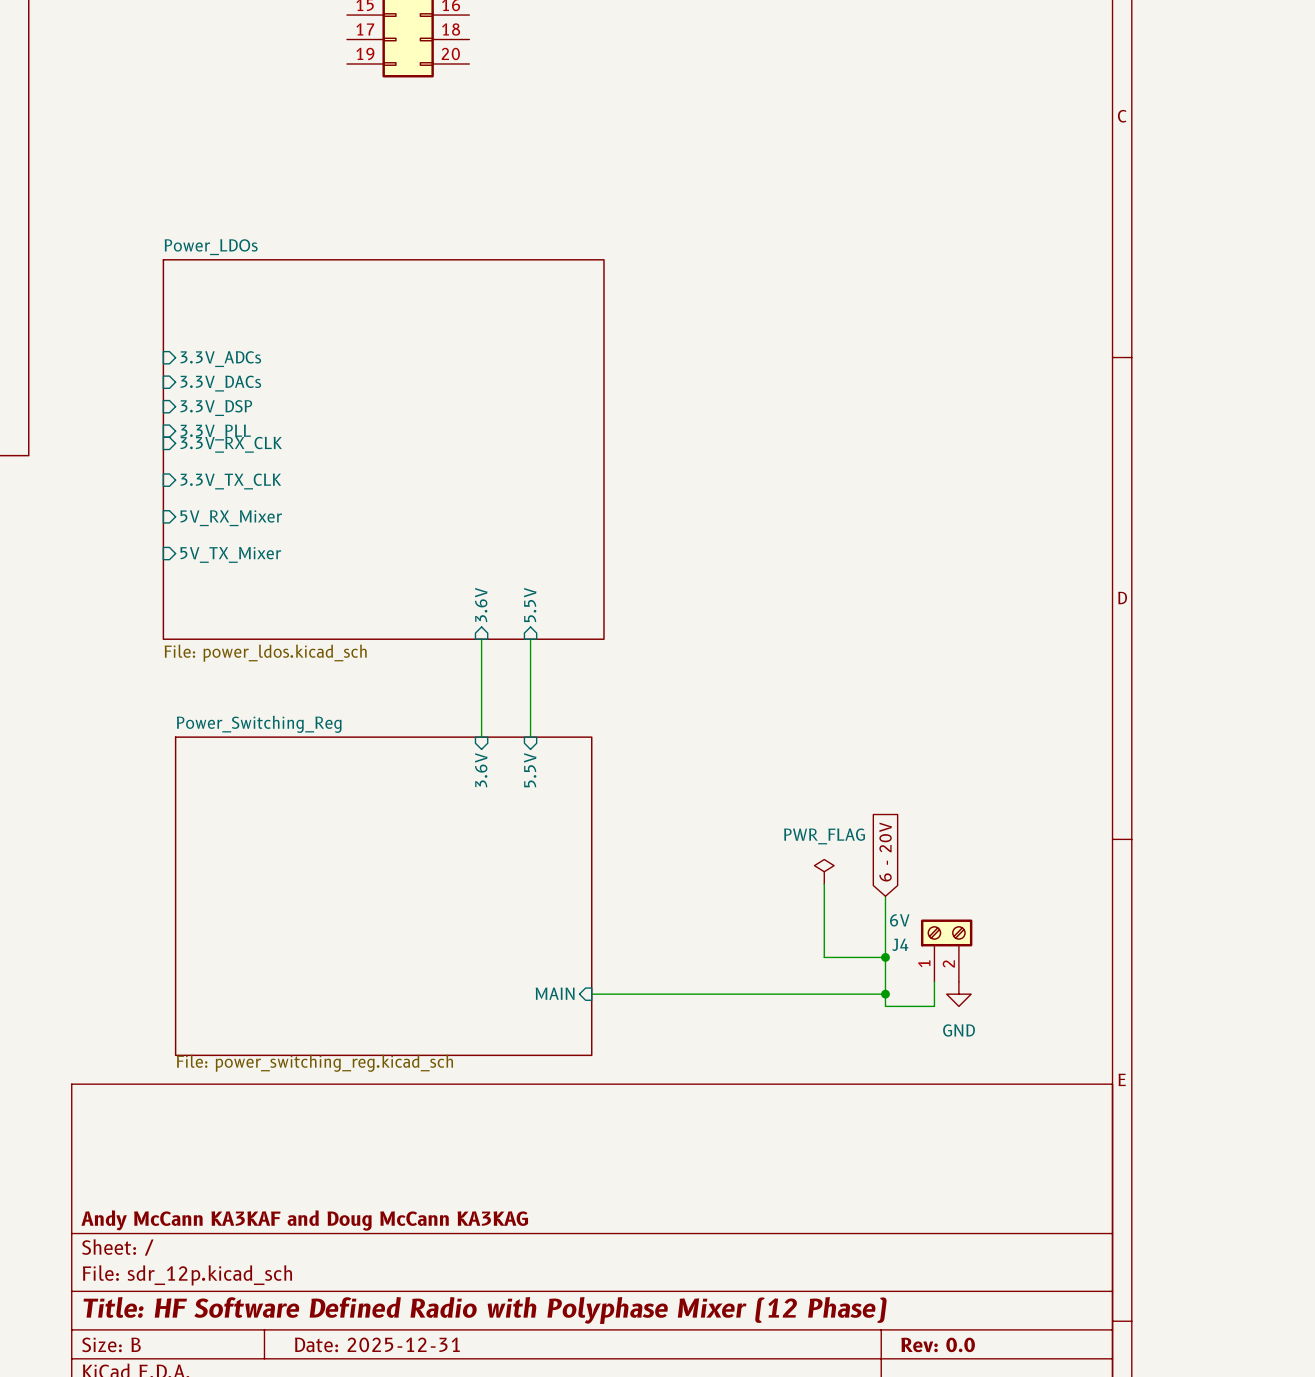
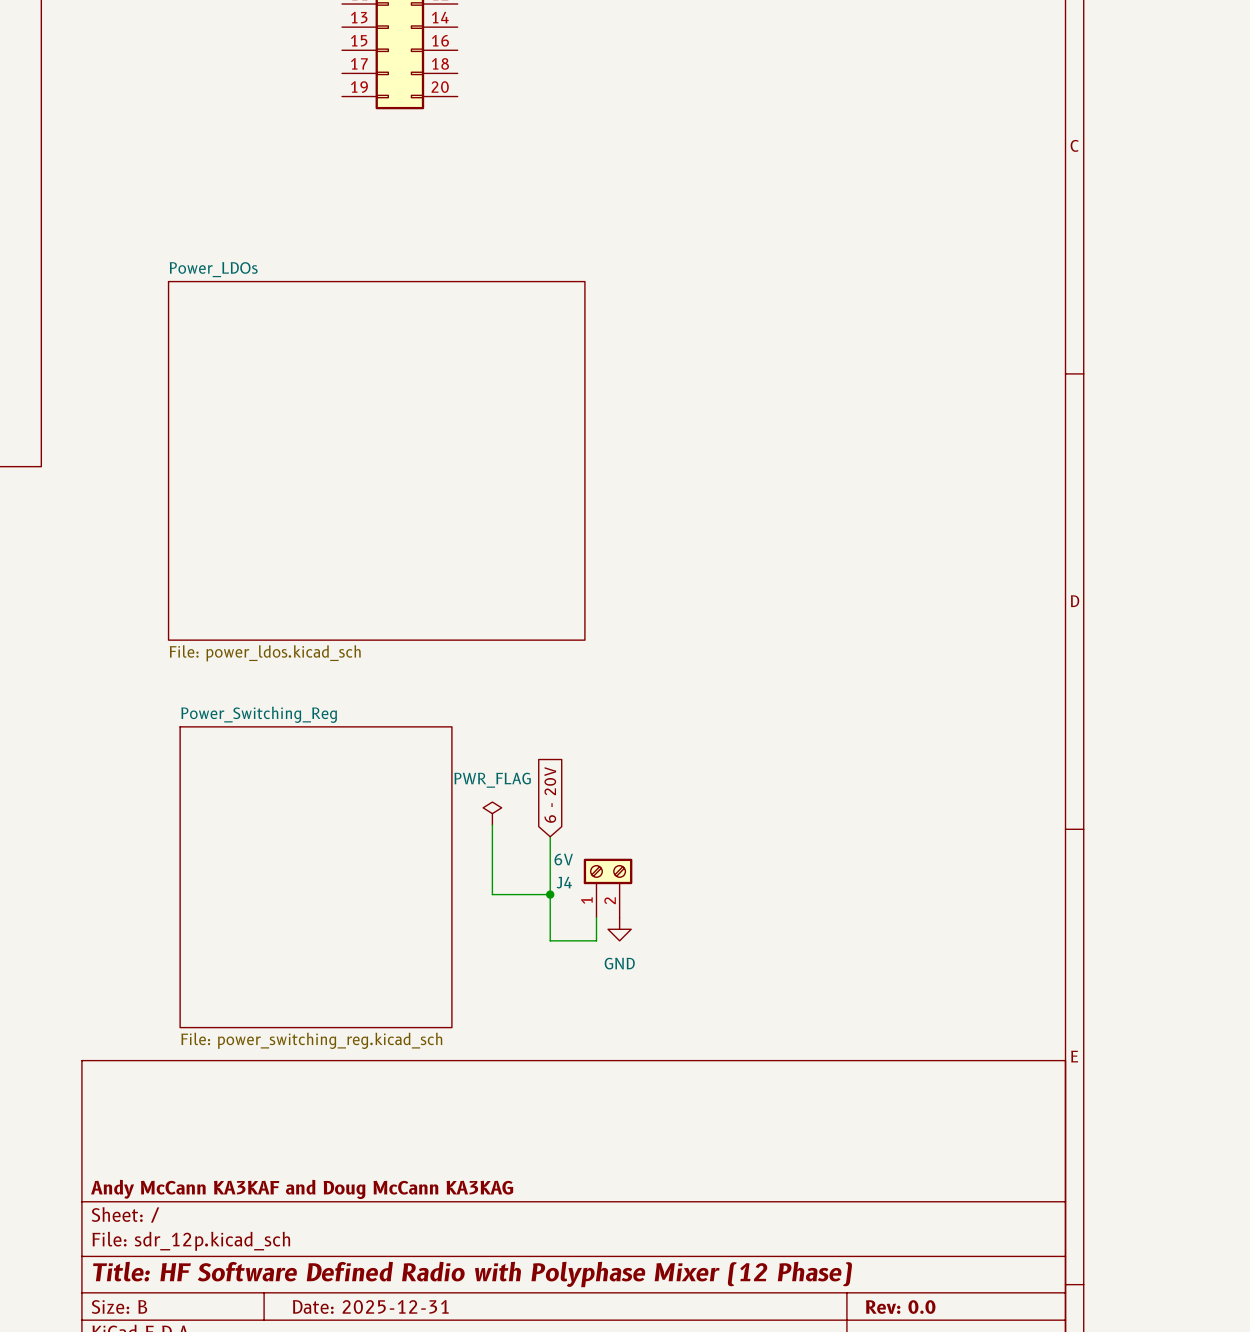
sheet pin: 3.3V_ADCs (220, 359) -> none
sheet pin: 3.3V_DACs (220, 383) -> none
sheet pin: 3.3V_DSP (216, 408) -> none
sheet pin: 3.3V_PLL (215, 432) -> none
sheet pin: 3.3V_RX_CLK (231, 444) -> none
sheet pin: 3.3V_TX_CLK (230, 481) -> none
sheet pin: 5V_RX_Mixer (231, 518) -> none
sheet pin: 5V_TX_Mixer (230, 554) -> none
sheet pin: 3.6V (481, 605) -> none
sheet pin: 5.5V (530, 605) -> none
wire: (481, 639) (481, 737) -> none
wire: (530, 639) (530, 737) -> none
sheet pin: 3.6V (481, 770) -> none
sheet pin: 5.5V (530, 770) -> none
global label: none -> 6 - 20V (550, 794)
power symbol: none -> PWR_FLAG (492, 813)
wire: none -> (492, 825) (492, 894) (550, 894)
wire: none -> (550, 836) (550, 940) (596, 940) (596, 917)
global label: 6 - 20V (885, 852) -> none
power symbol: PWR_FLAG (824, 871) -> none
wire: (824, 884) (824, 957) (885, 957) -> none
sheet Power_Switching_Reg: none -> File: power_switching_reg.kicad_sch (316, 877)
sheet Power_Switching_Reg: File: power_switching_reg.kicad_sch (383, 896) -> none
wire: (885, 896) (885, 1006) (934, 1006) (934, 981) -> none
junction: none -> (550, 894)
power symbol: none -> GND (619, 929)
J4 position: (946, 950) -> (608, 888)
junction: (885, 957) -> none
sheet pin: MAIN (555, 993) -> none
wire: (591, 994) (885, 994) -> none
junction: (885, 994) -> none
power symbol: GND (958, 994) -> none

